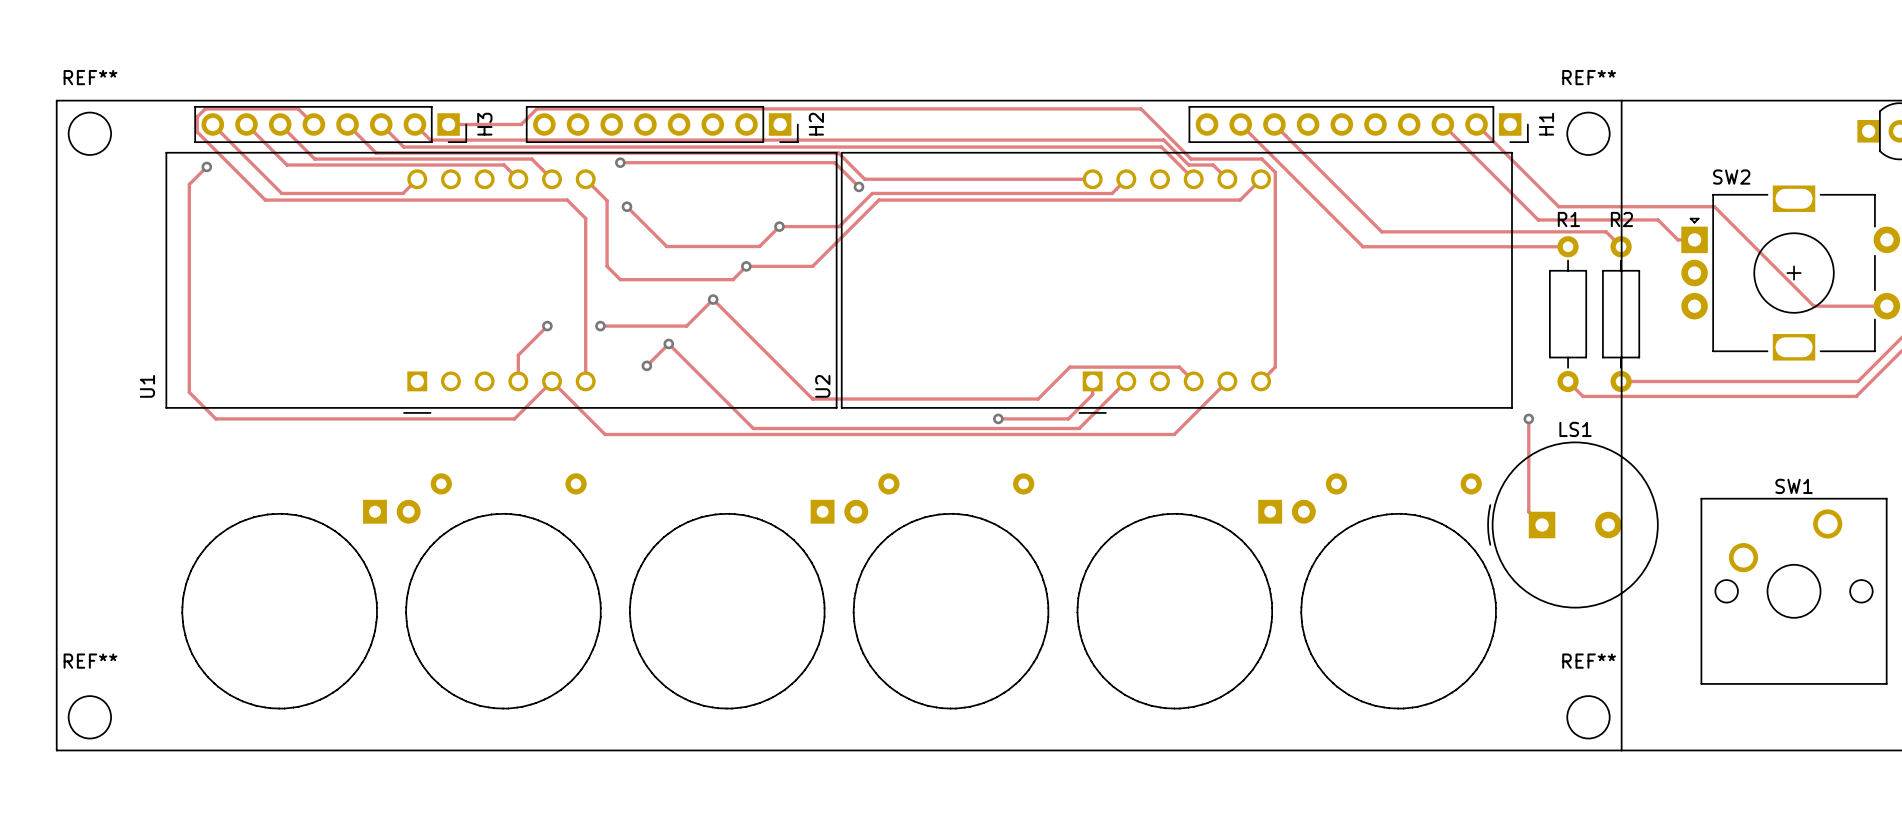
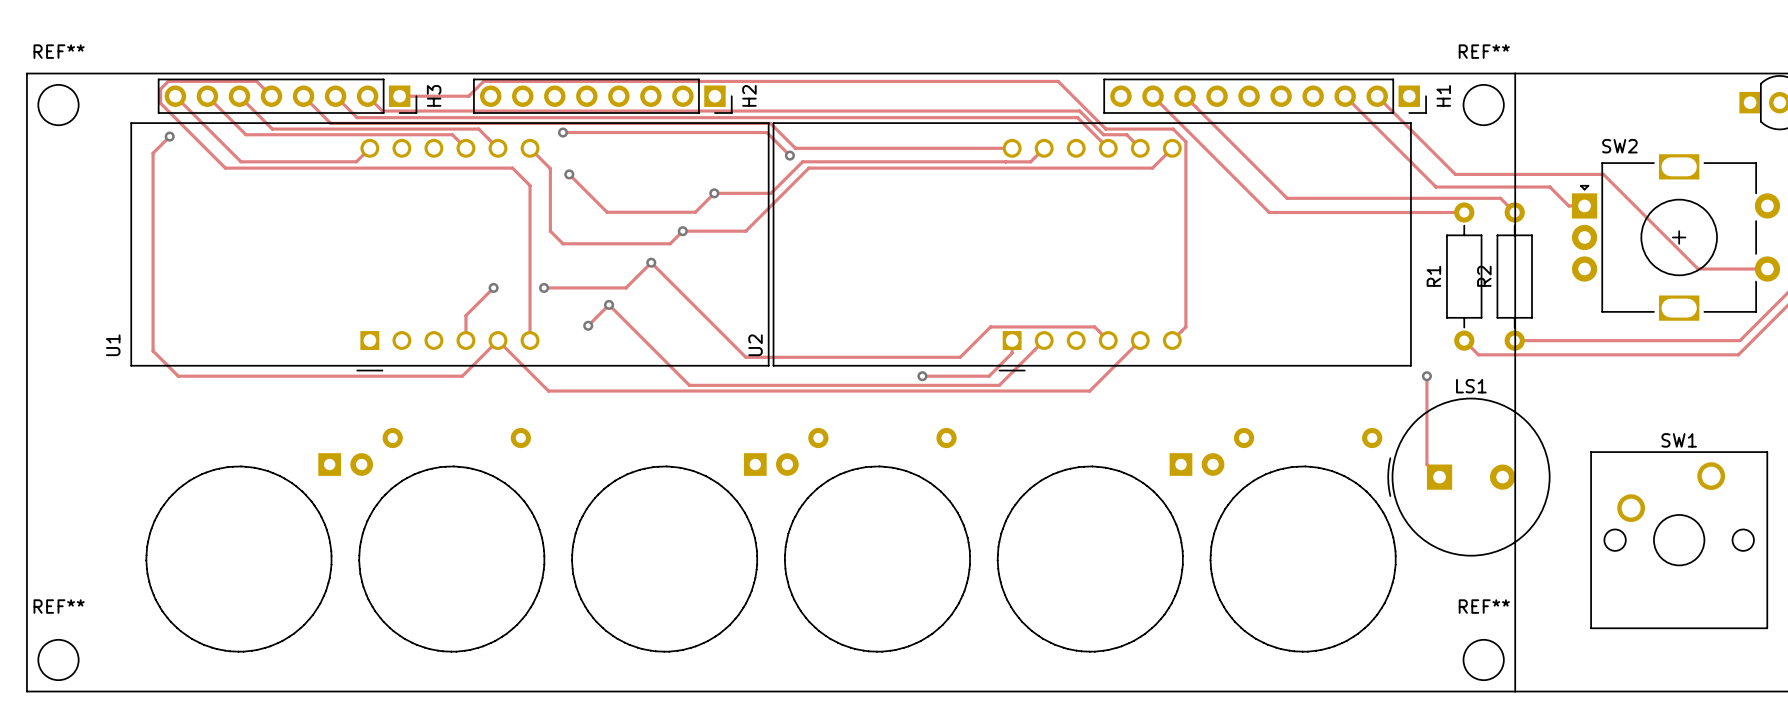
R1 name rotation: 0° (1568, 219) -> 90° counterclockwise (1433, 276)
R1 name position: R1 (1568, 219) -> R1 (1433, 276)
R2 name rotation: 0° (1621, 219) -> 90° counterclockwise (1484, 276)
R2 name position: R2 (1621, 219) -> R2 (1484, 276)

